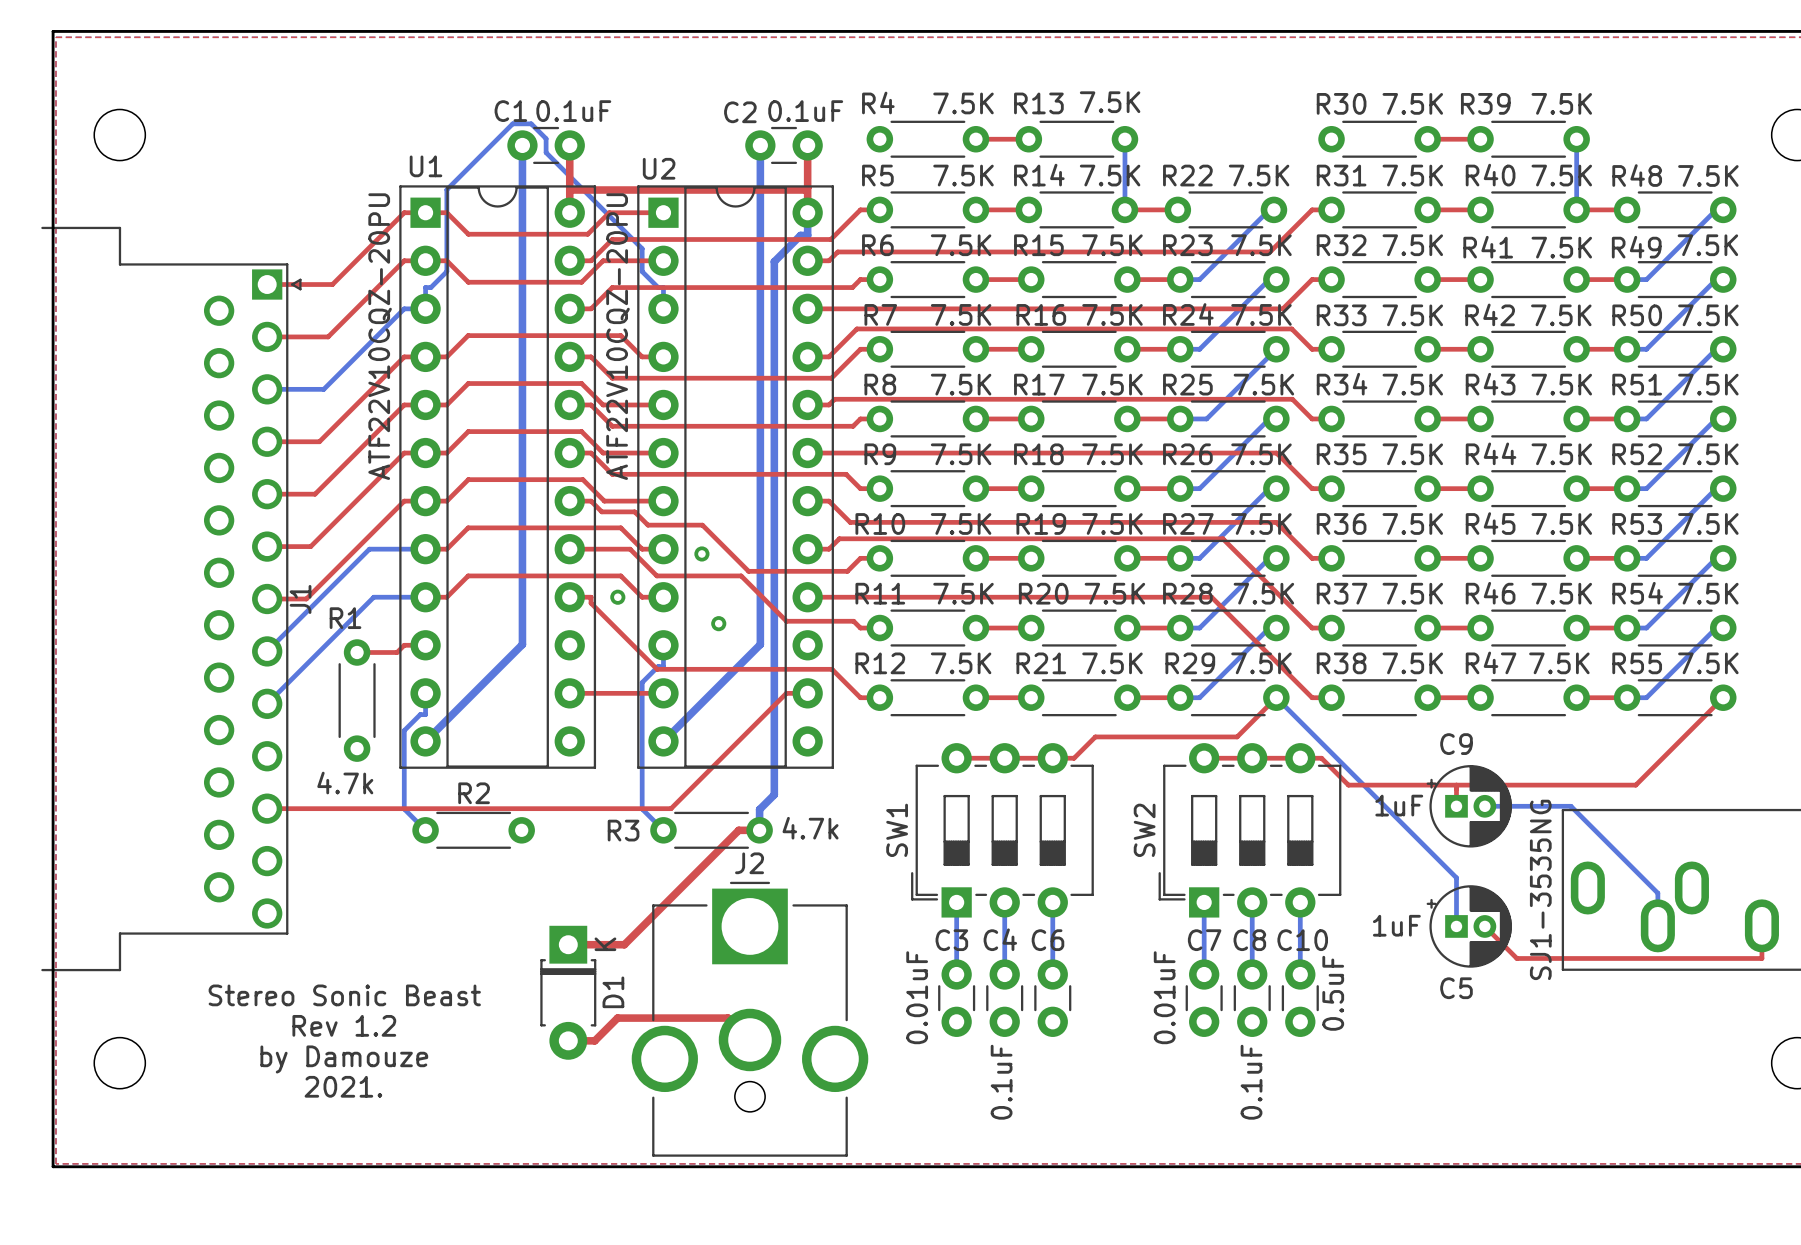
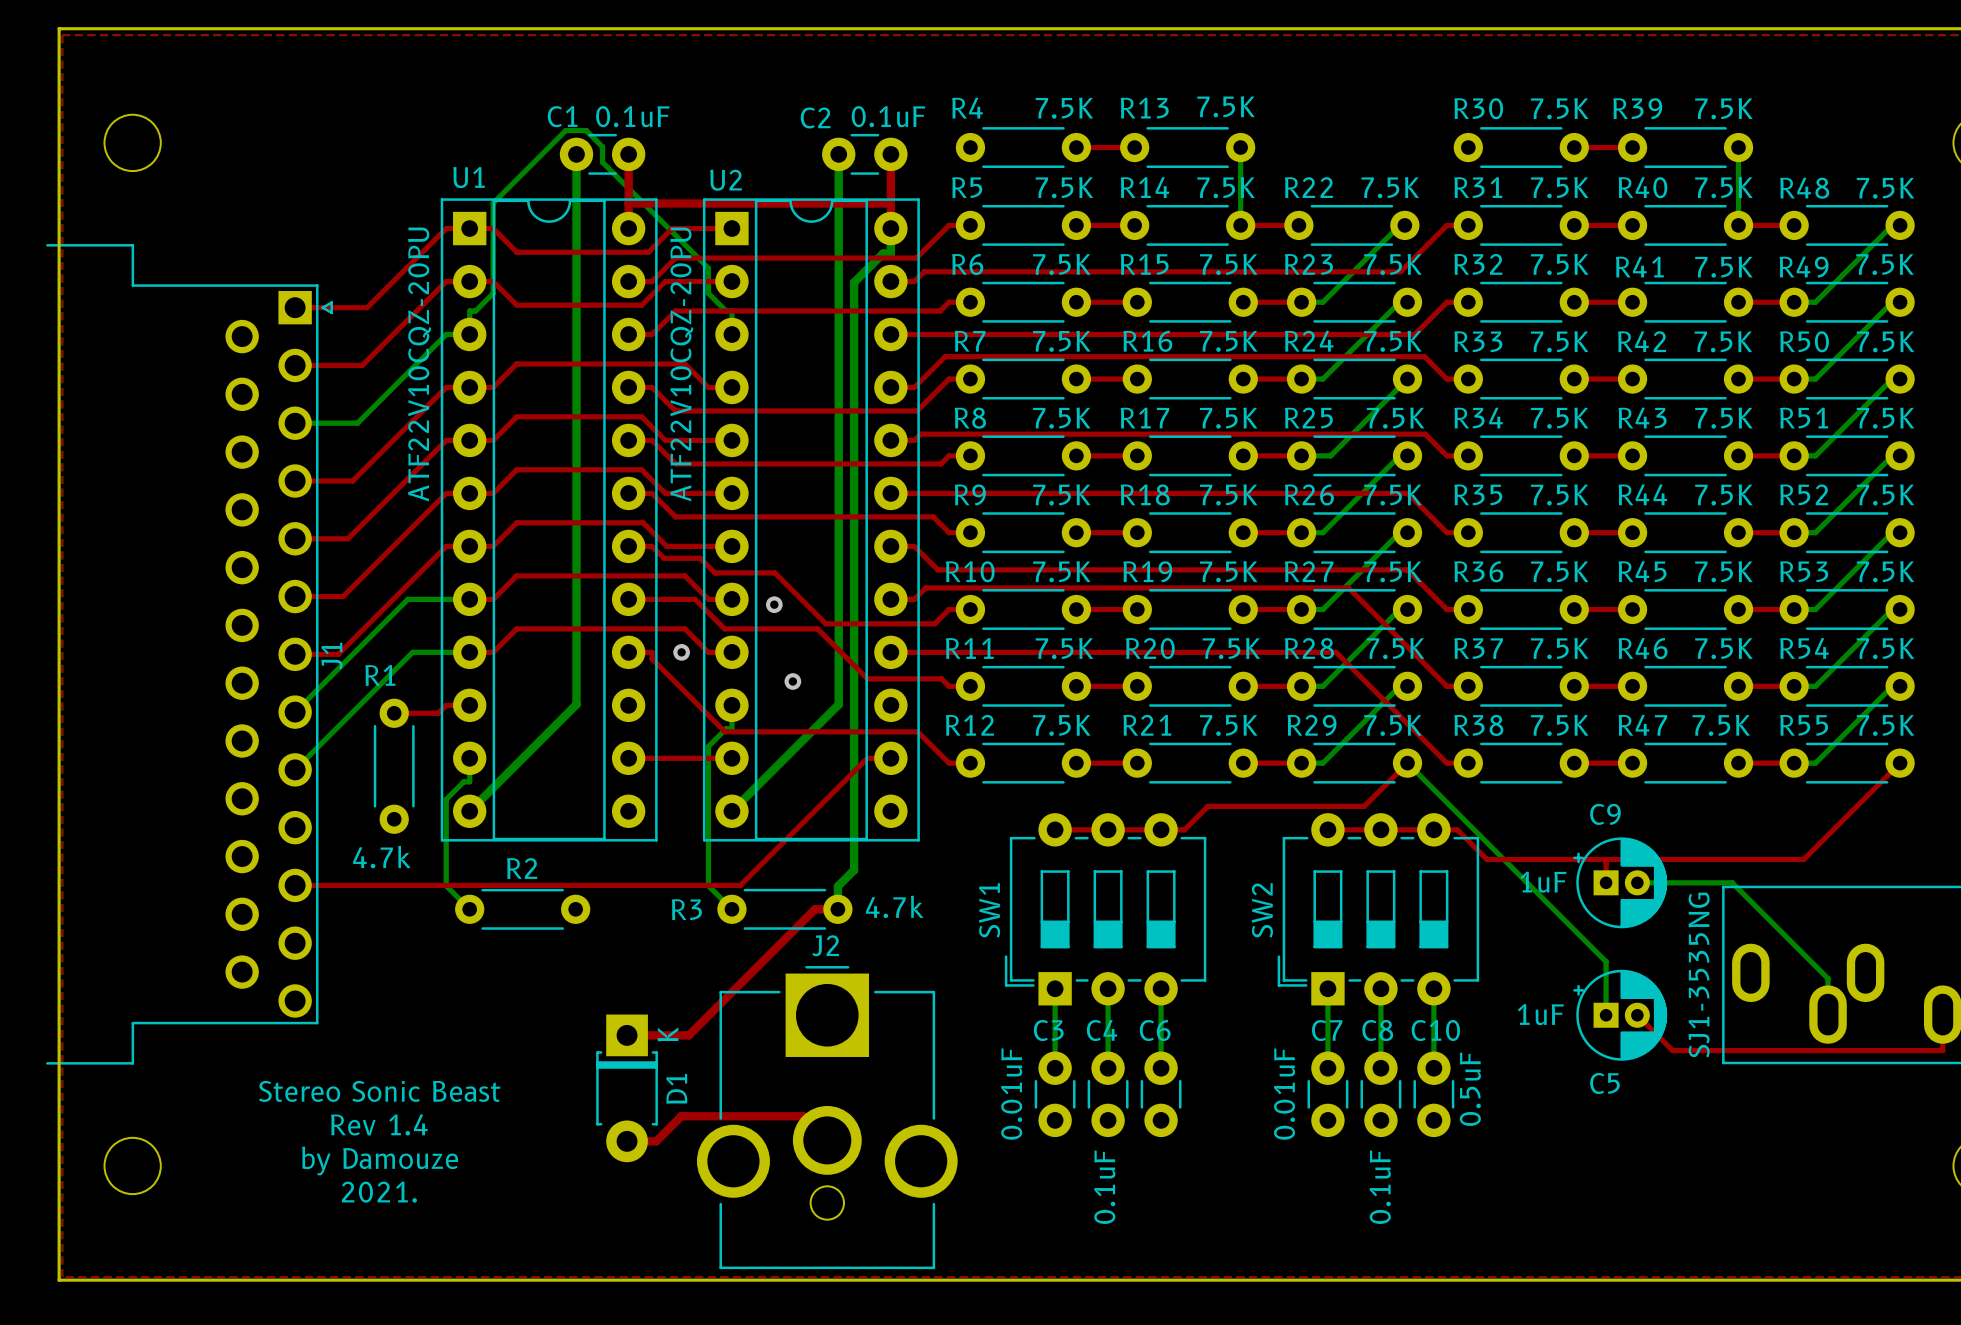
text: Rev 1.2 (344, 1025) -> Rev 1.4 (379, 1124)

